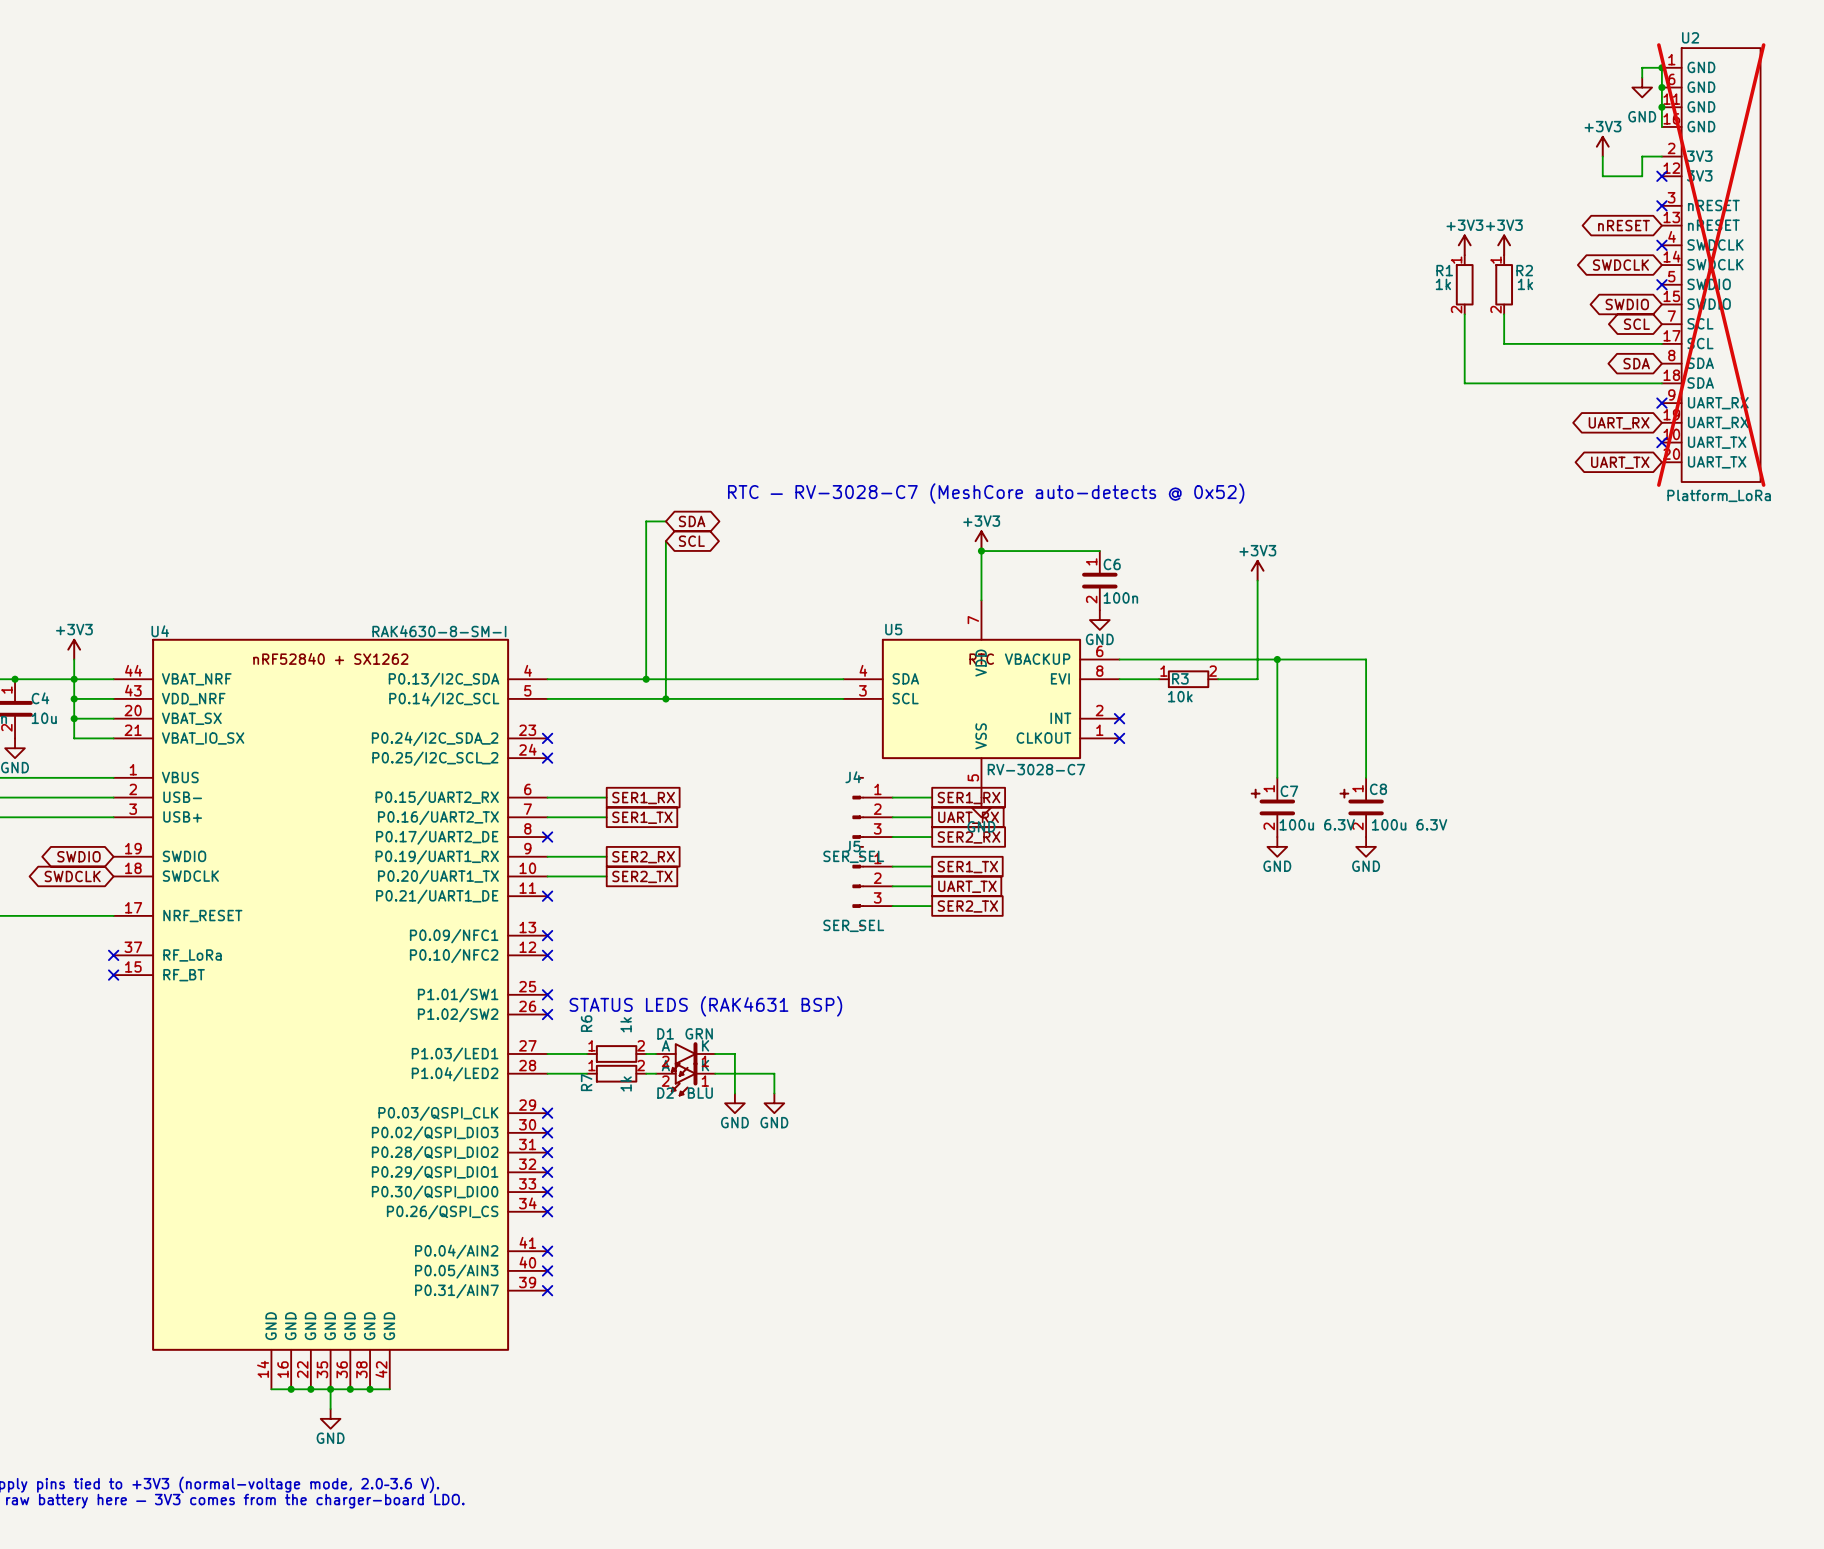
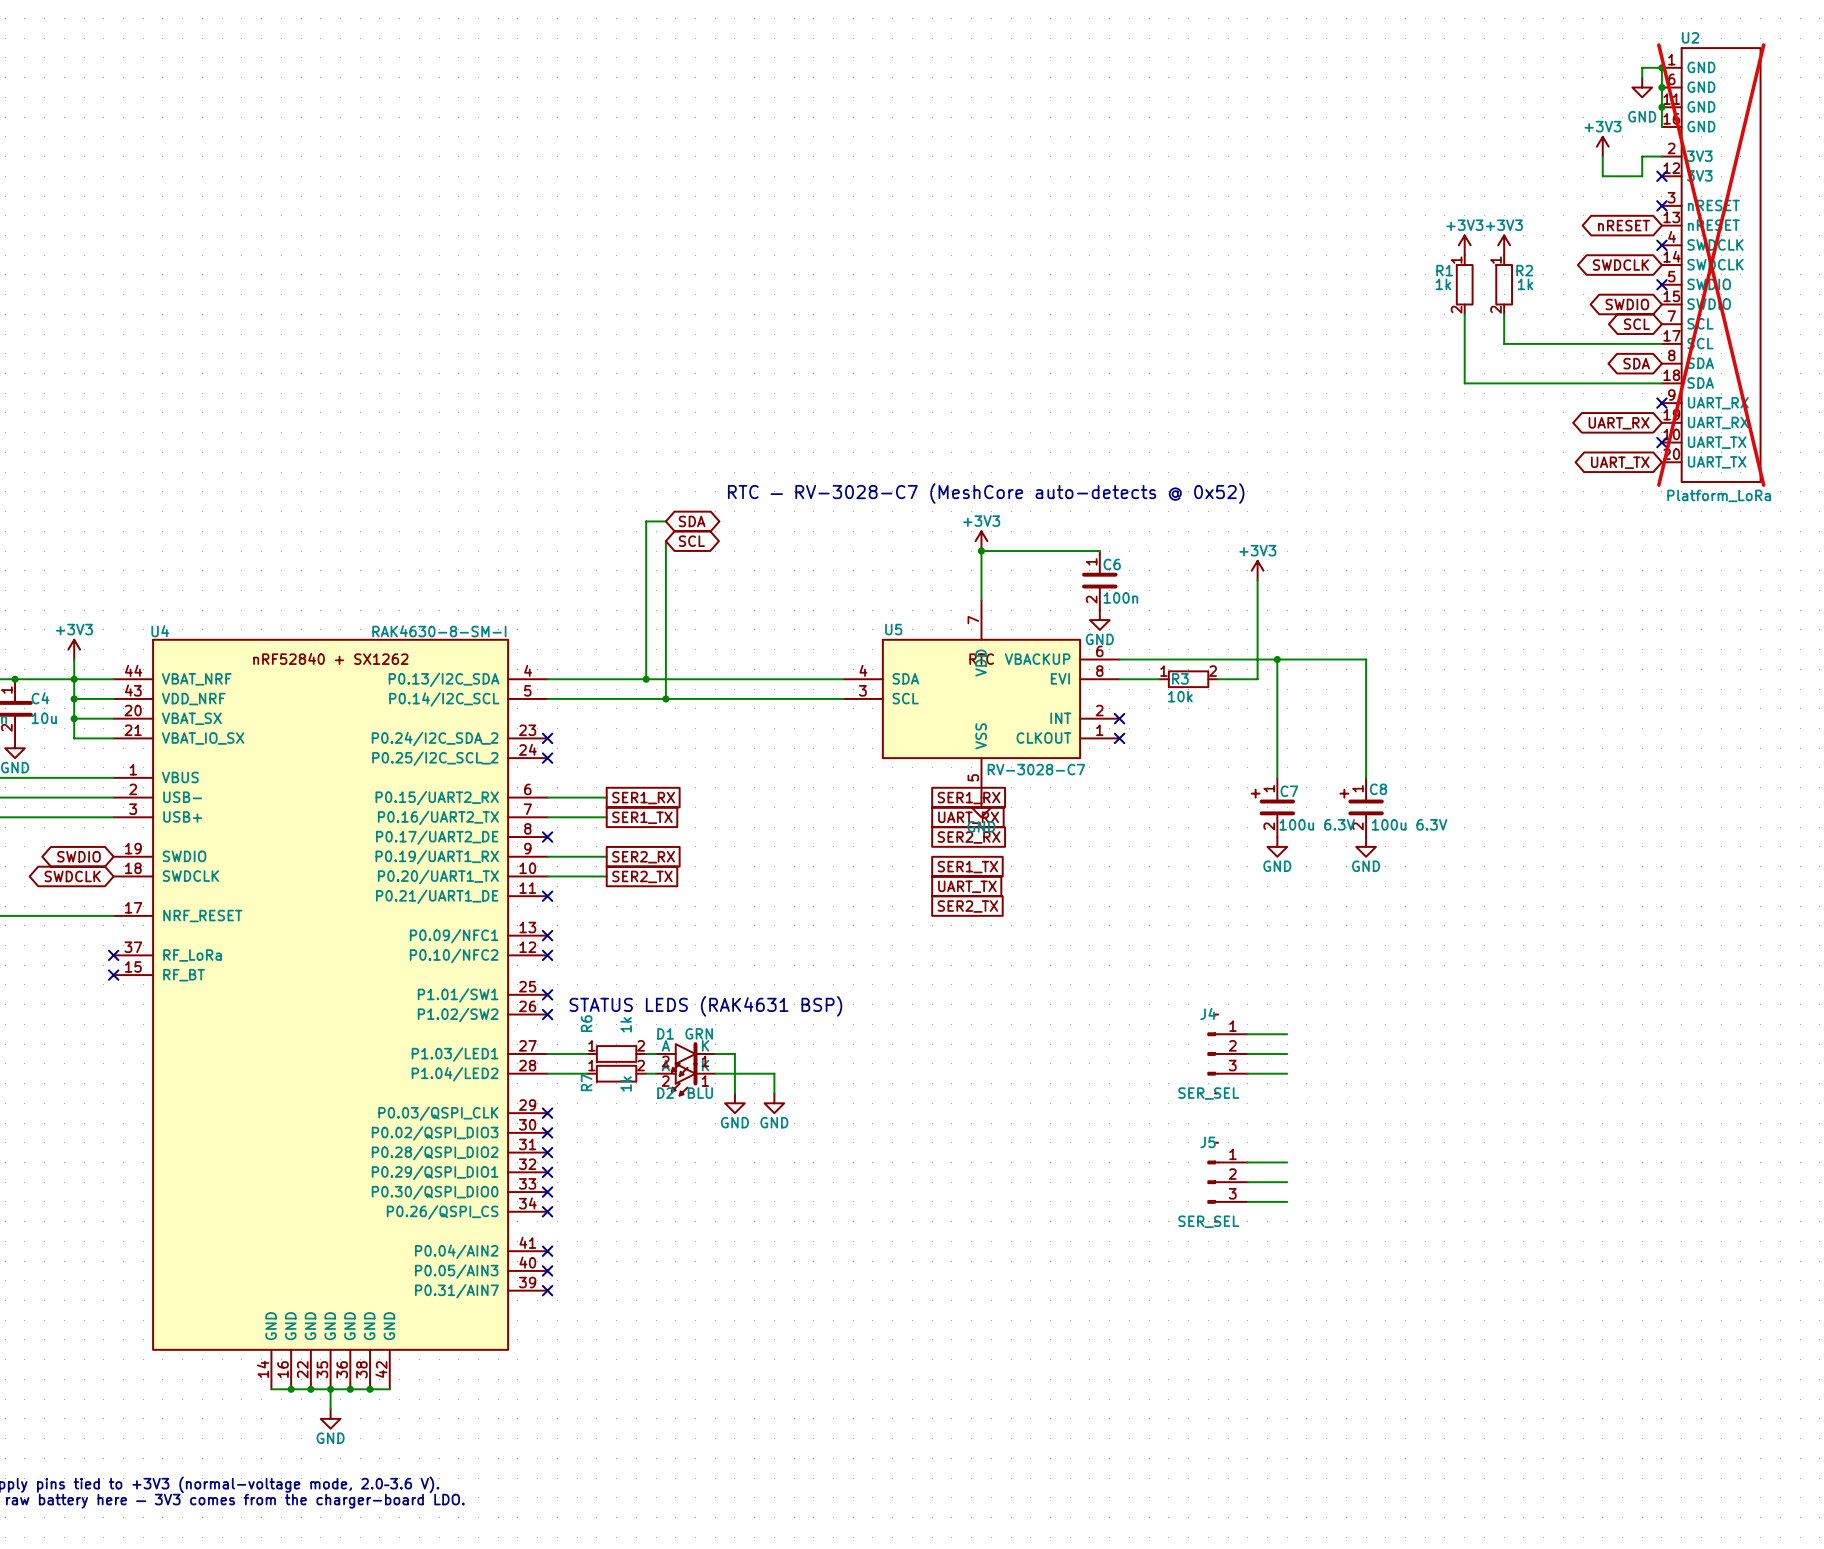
wire: (892, 797) (932, 797) -> none
J4 position: (872, 817) -> (1227, 1053)
wire: (892, 817) (932, 817) -> none
wire: (892, 837) (932, 837) -> none
wire: (892, 866) (932, 866) -> none
J5 position: (872, 886) -> (1227, 1182)
wire: (892, 886) (932, 886) -> none
wire: (892, 906) (932, 906) -> none
wire: none -> (1247, 1034) (1287, 1034)
wire: none -> (1247, 1053) (1287, 1053)
wire: none -> (1247, 1073) (1287, 1073)
wire: none -> (1247, 1162) (1287, 1162)
wire: none -> (1247, 1182) (1287, 1182)
wire: none -> (1247, 1201) (1287, 1201)

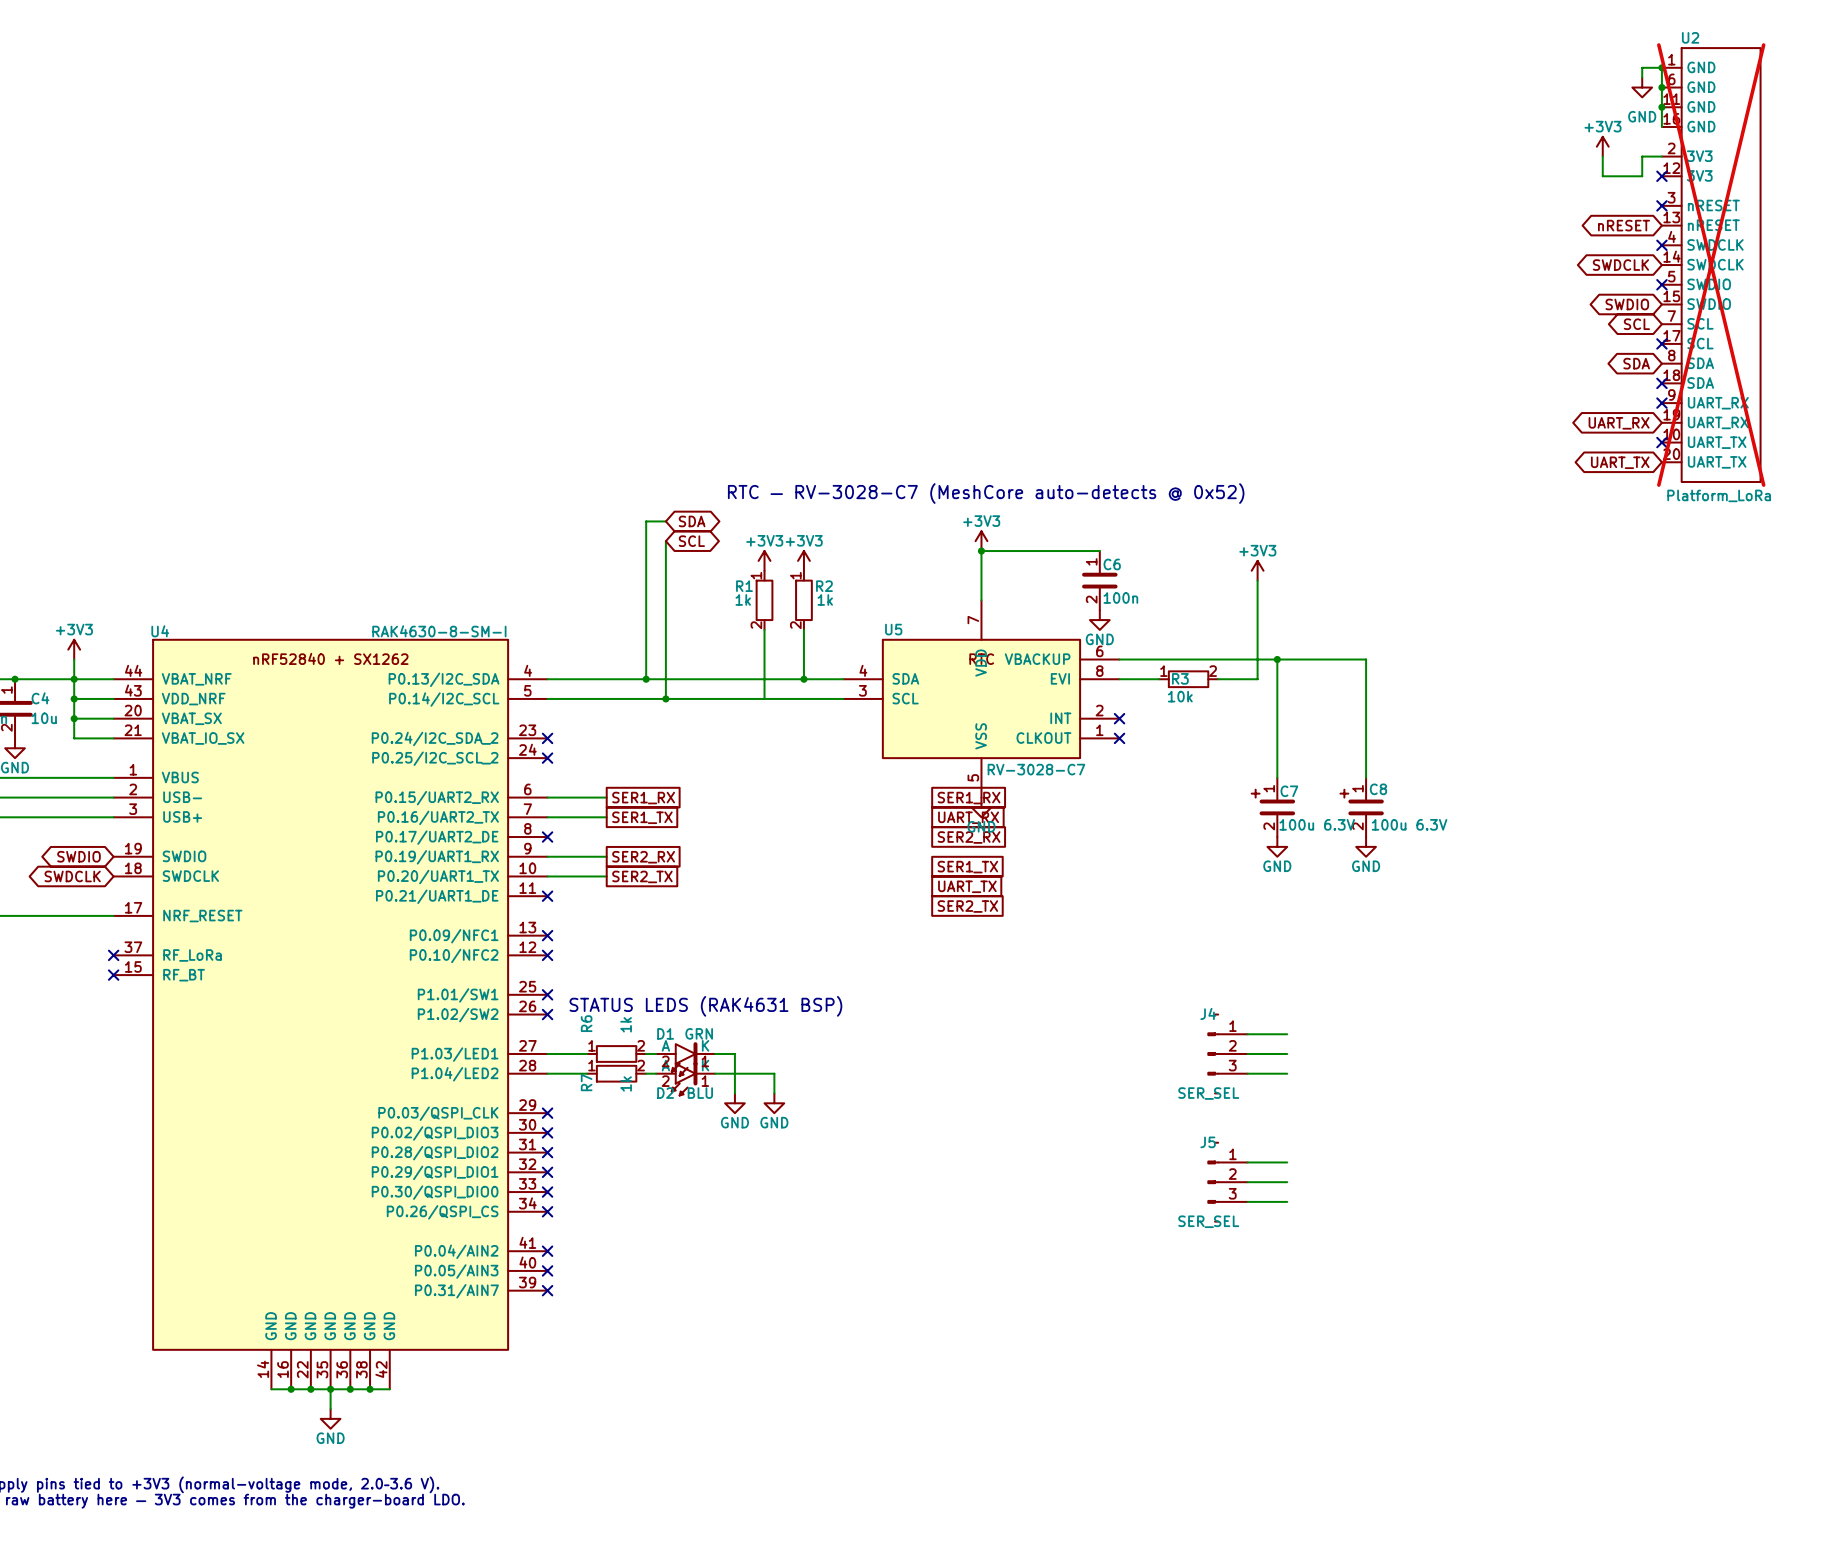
power symbol: +3V3 (1464, 245) -> none
power symbol: +3V3 (1504, 245) -> none
R1 position: (1464, 284) -> (764, 600)
R2 position: (1504, 284) -> (803, 600)
wire: (1464, 314) (1464, 383) (1661, 383) -> none
wire: (1504, 314) (1504, 343) (1661, 343) -> none
no-connect mark: none -> (1661, 343)
no-connect mark: none -> (1661, 383)
power symbol: none -> +3V3 (764, 560)
power symbol: none -> +3V3 (803, 560)
wire: none -> (764, 629) (764, 698)
wire: none -> (803, 629) (803, 679)
junction: none -> (803, 679)

